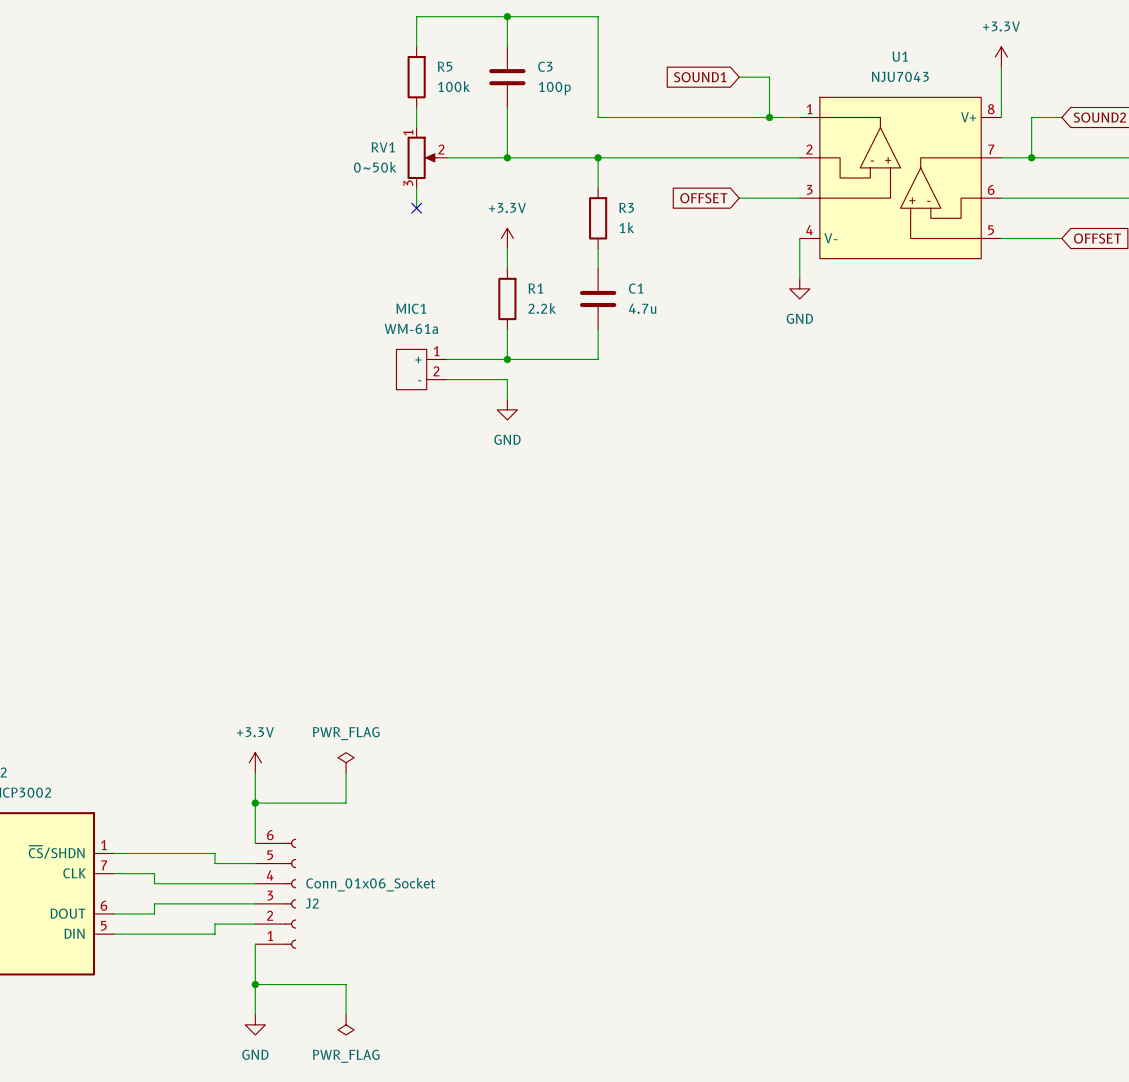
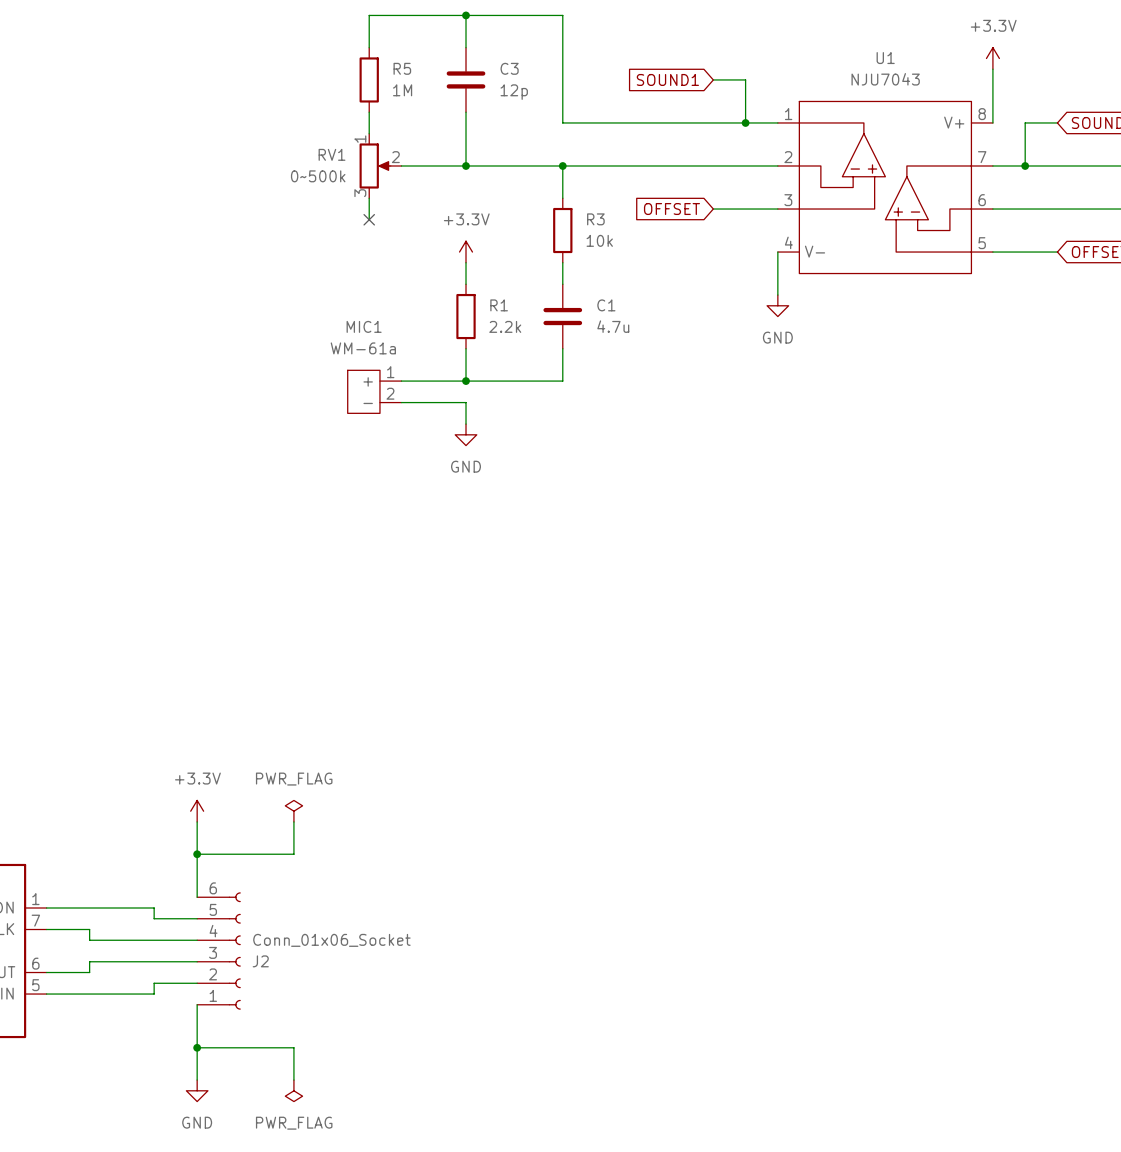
R5 value: 100k (454, 86) -> 1M (402, 90)
C3 value: 100p (554, 88) -> 12p (514, 92)
RV1 value: 0~50k (375, 167) -> 0~500k (318, 176)
R3 value: 1k (626, 227) -> 10k (599, 240)

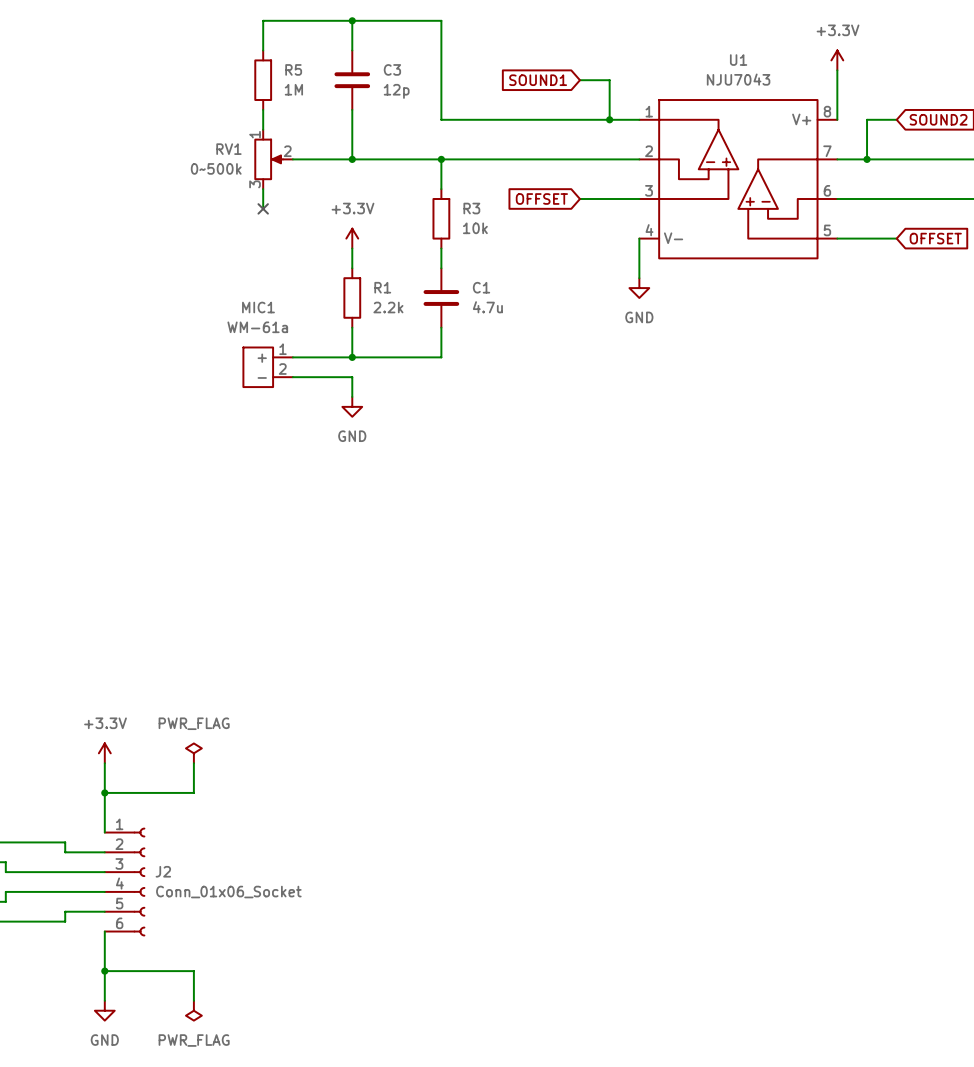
J2 flip: as is (234, 951) -> up-down (139, 882)

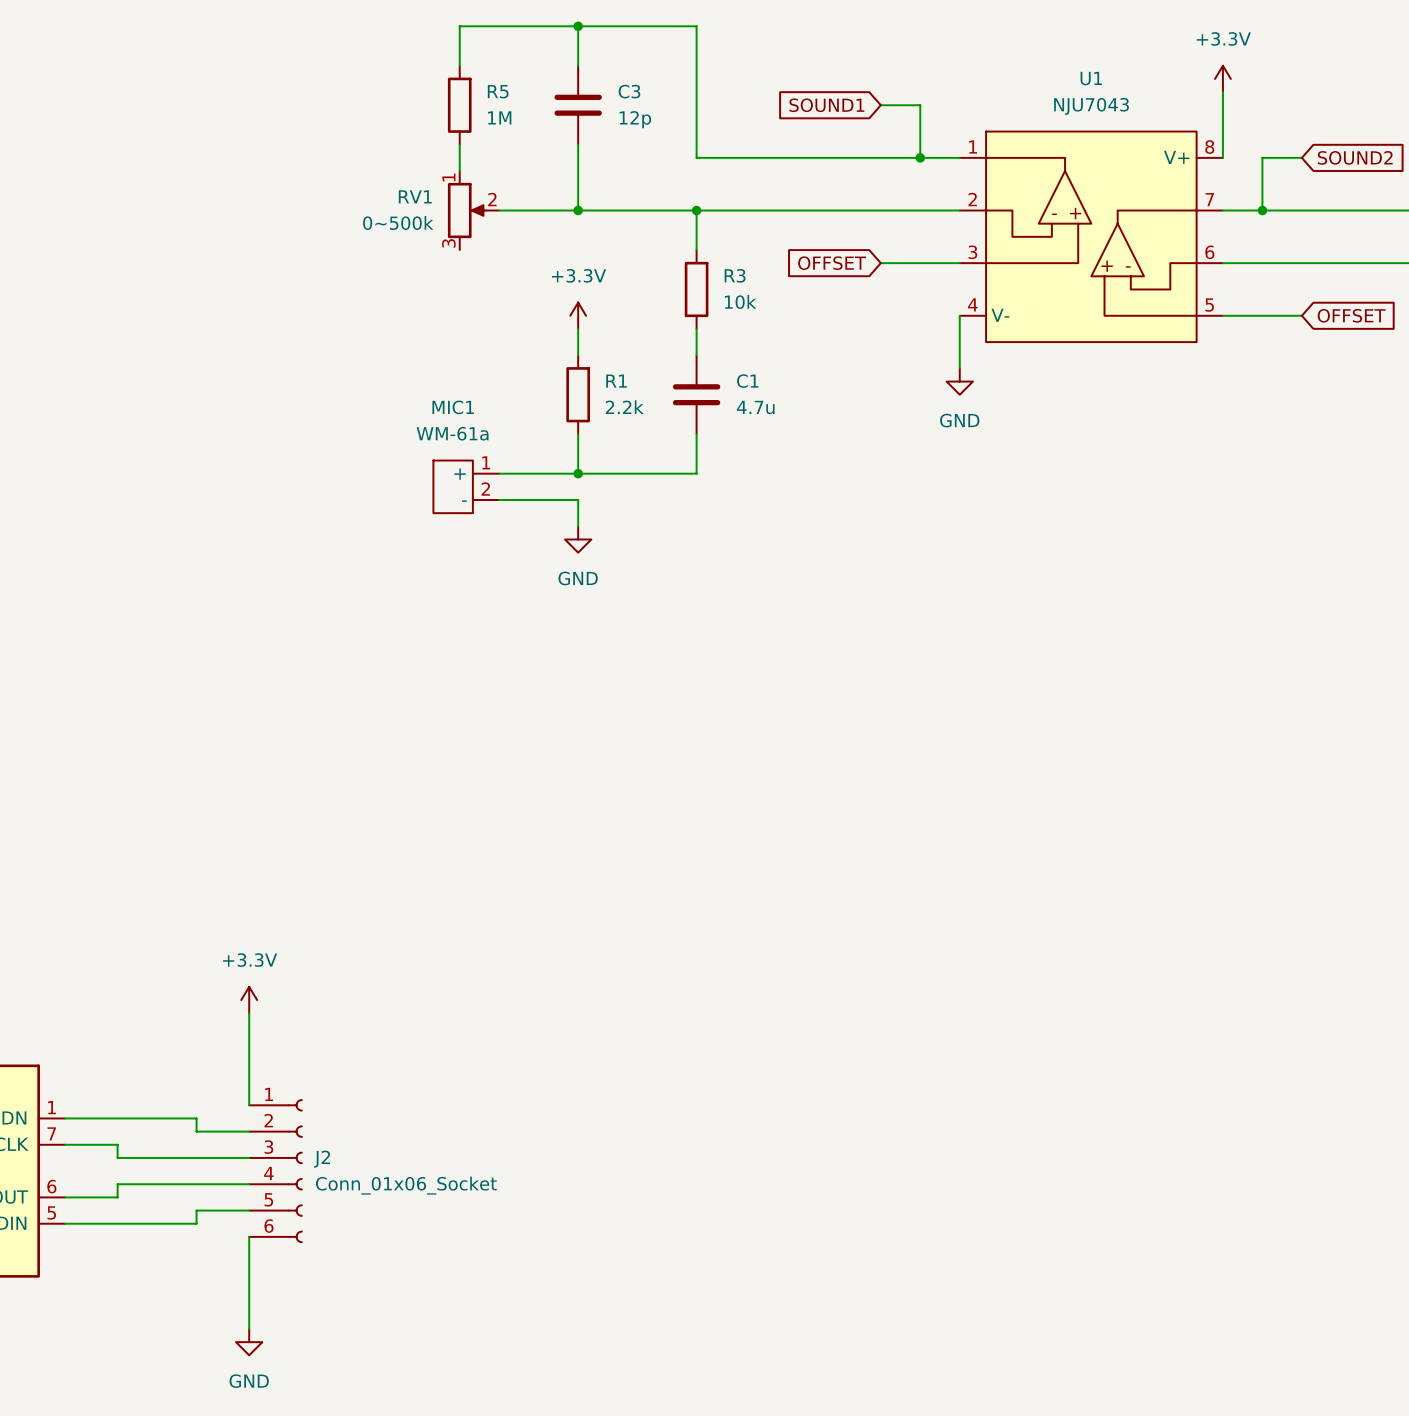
wire: (263, 189) (263, 208) -> none
no-connect mark: (263, 208) -> none
power symbol: PWR_FLAG (193, 753) -> none
wire: (193, 763) (193, 792) (104, 792) -> none
junction: (104, 792) -> none
wire: (104, 971) (193, 971) (193, 1000) -> none
junction: (104, 971) -> none
power symbol: PWR_FLAG (193, 1010) -> none

